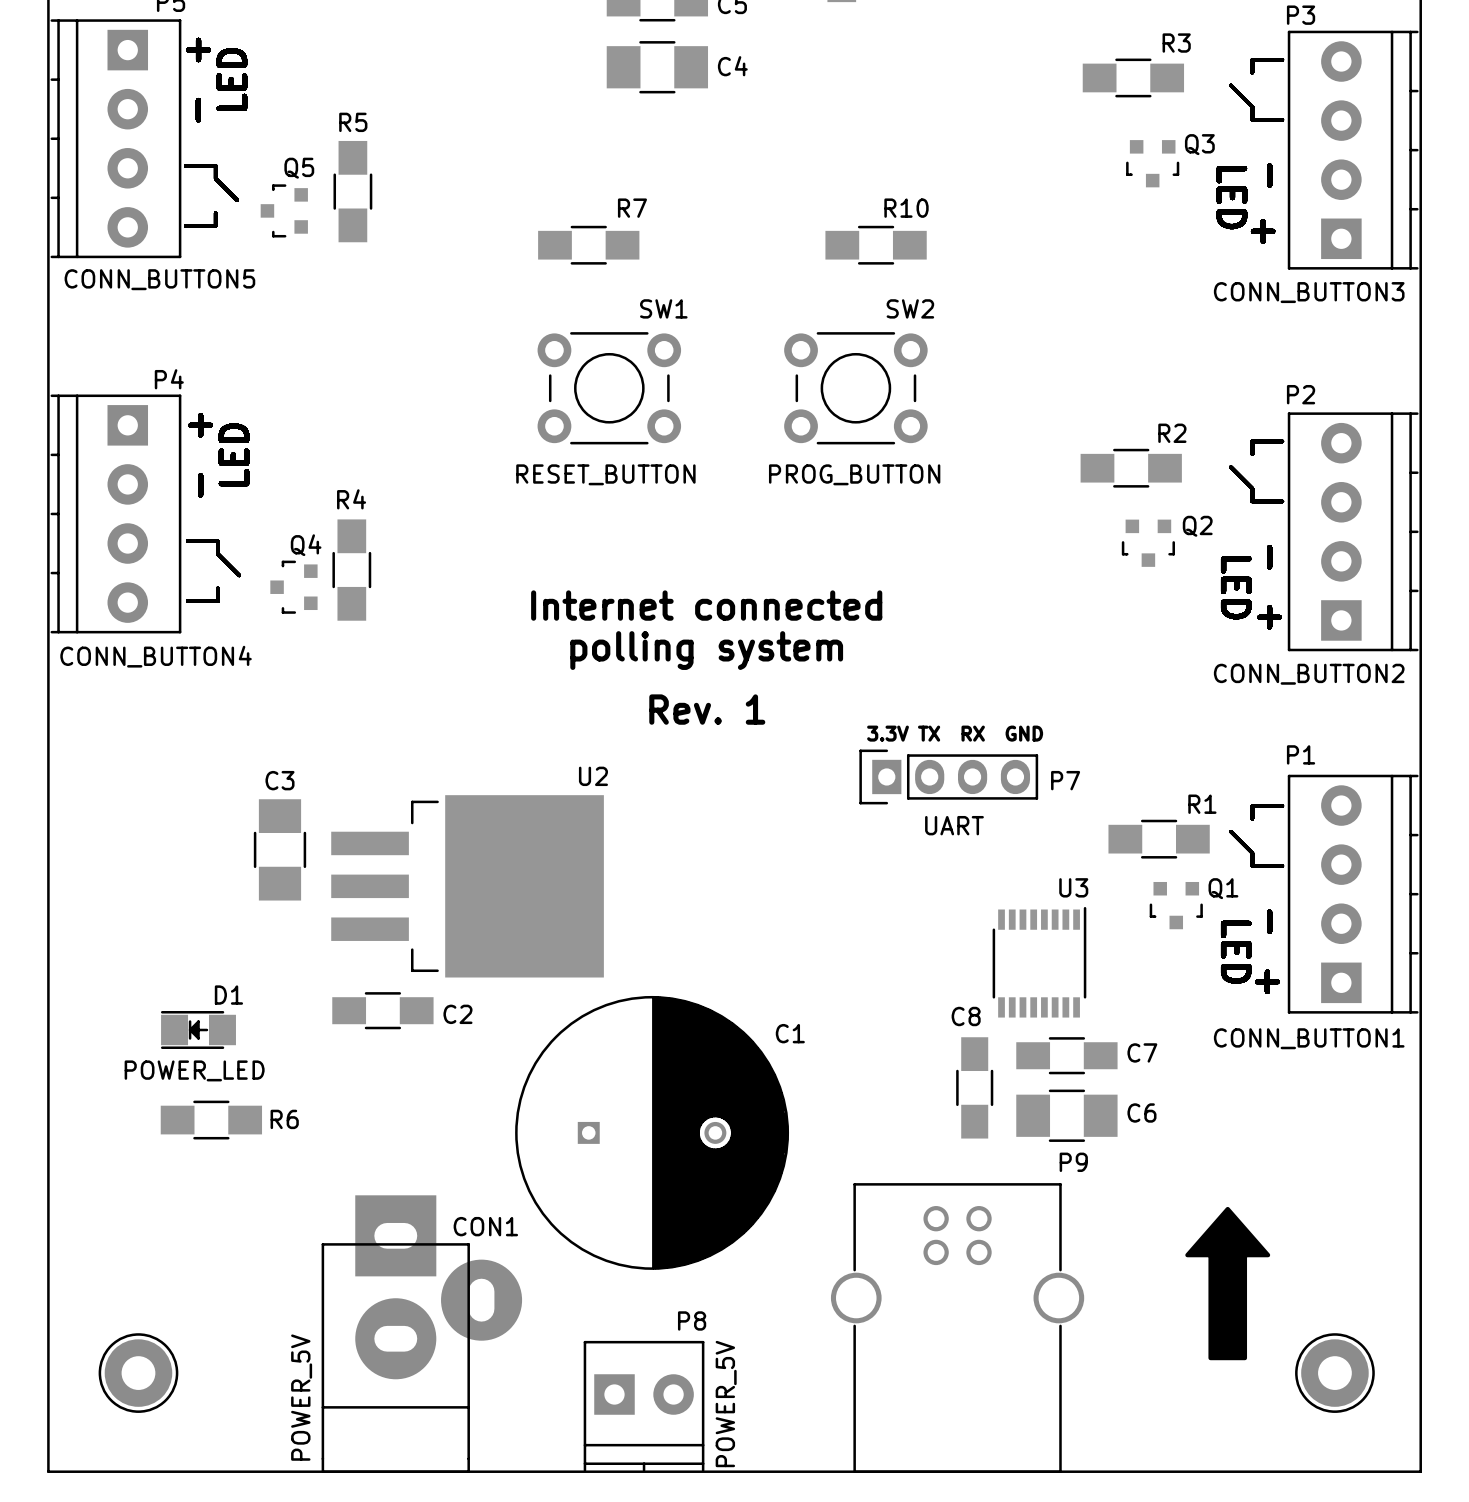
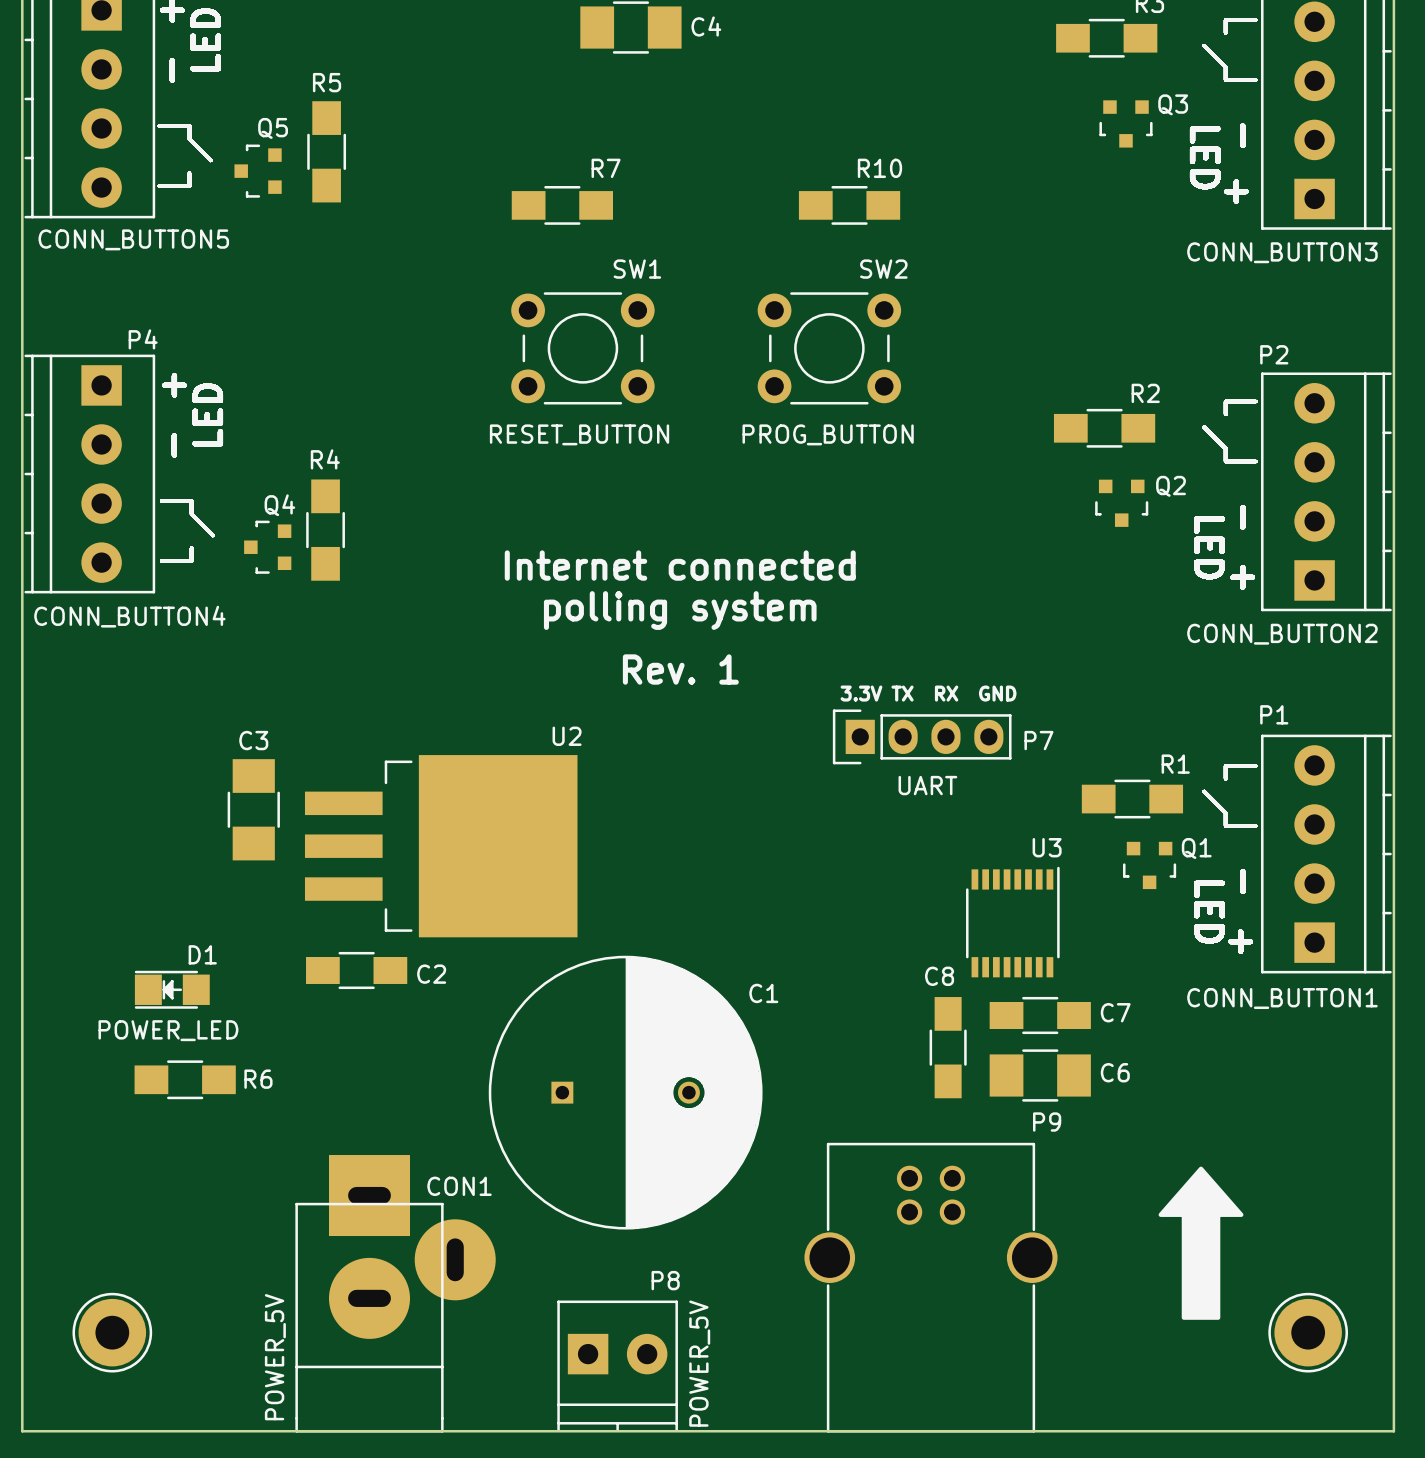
CON1 footprint: [321, 1195, 523, 1473] -> [295, 1155, 496, 1433]

